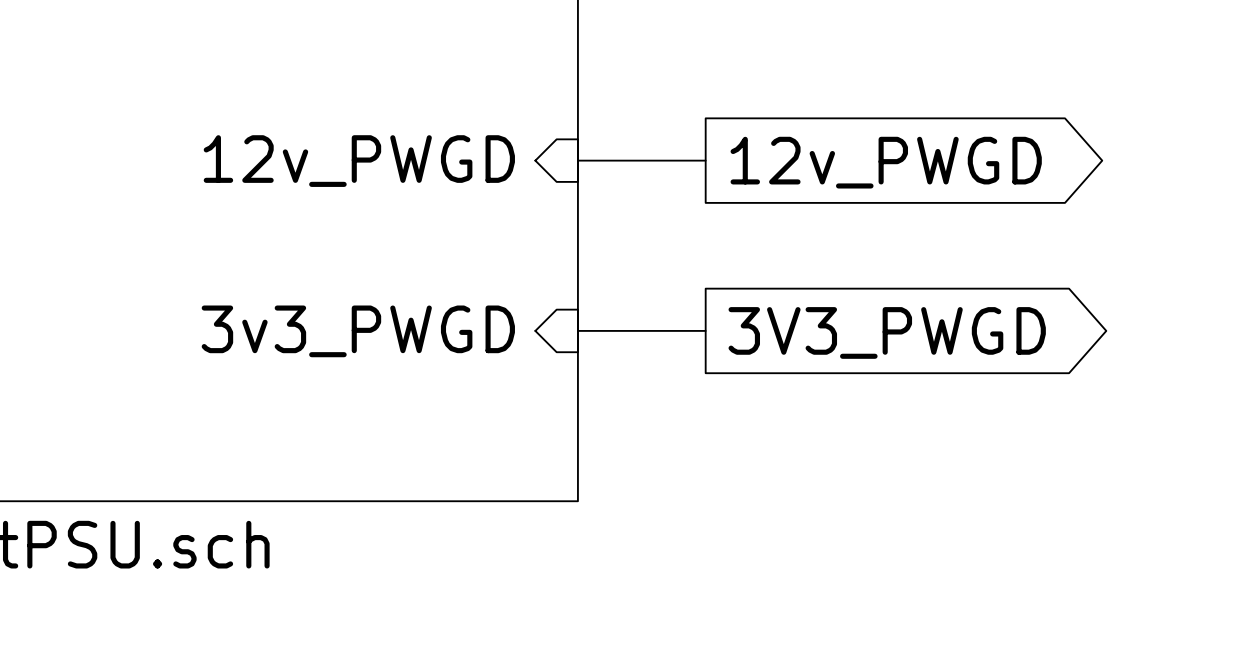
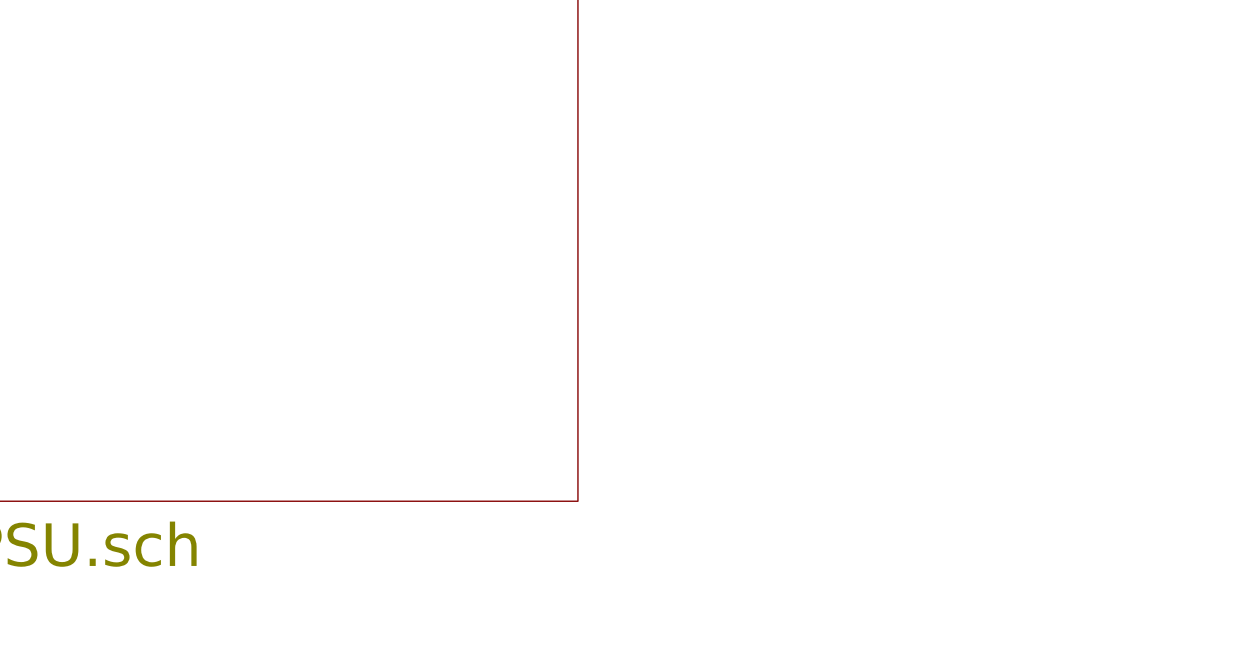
wire: (577, 160) (705, 160) -> none
sheet pin: 12v_PWGD (359, 161) -> none
global label: 12v_PWGD (886, 162) -> none
wire: (577, 330) (705, 330) -> none
sheet pin: 3v3_PWGD (358, 331) -> none
global label: 3V3_PWGD (887, 332) -> none

